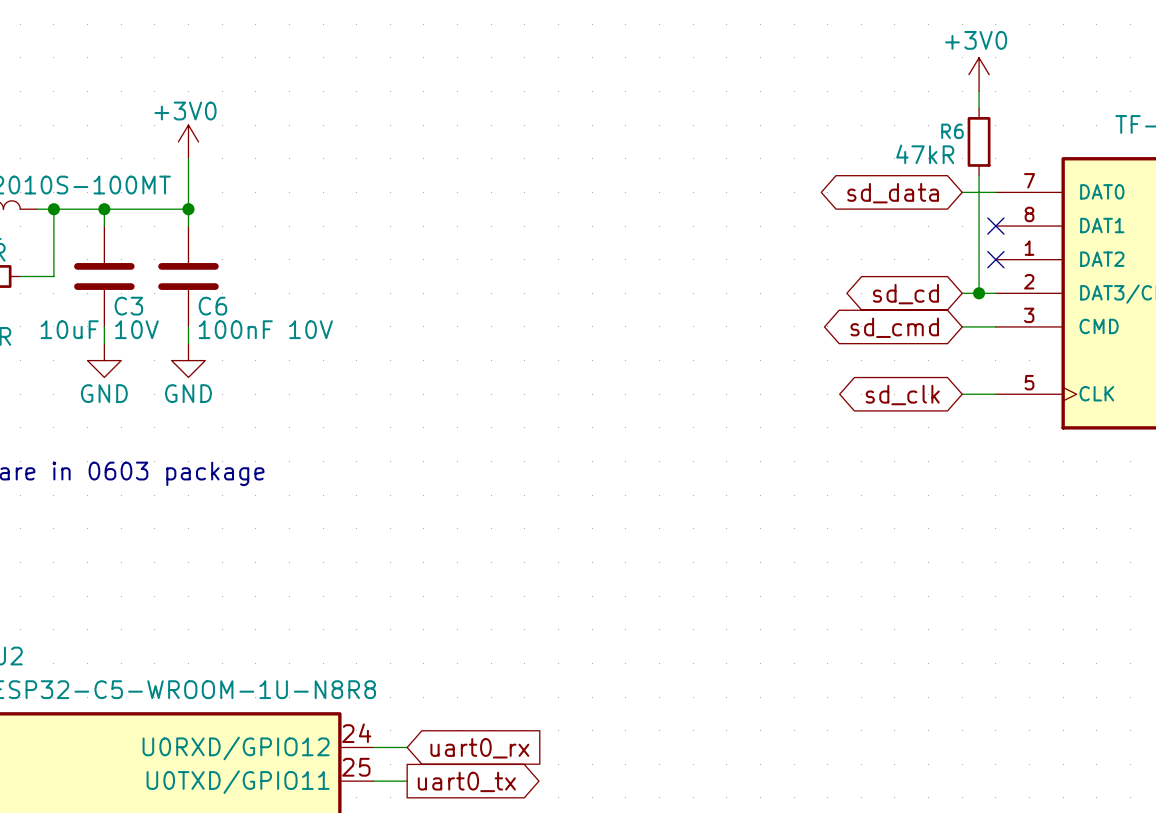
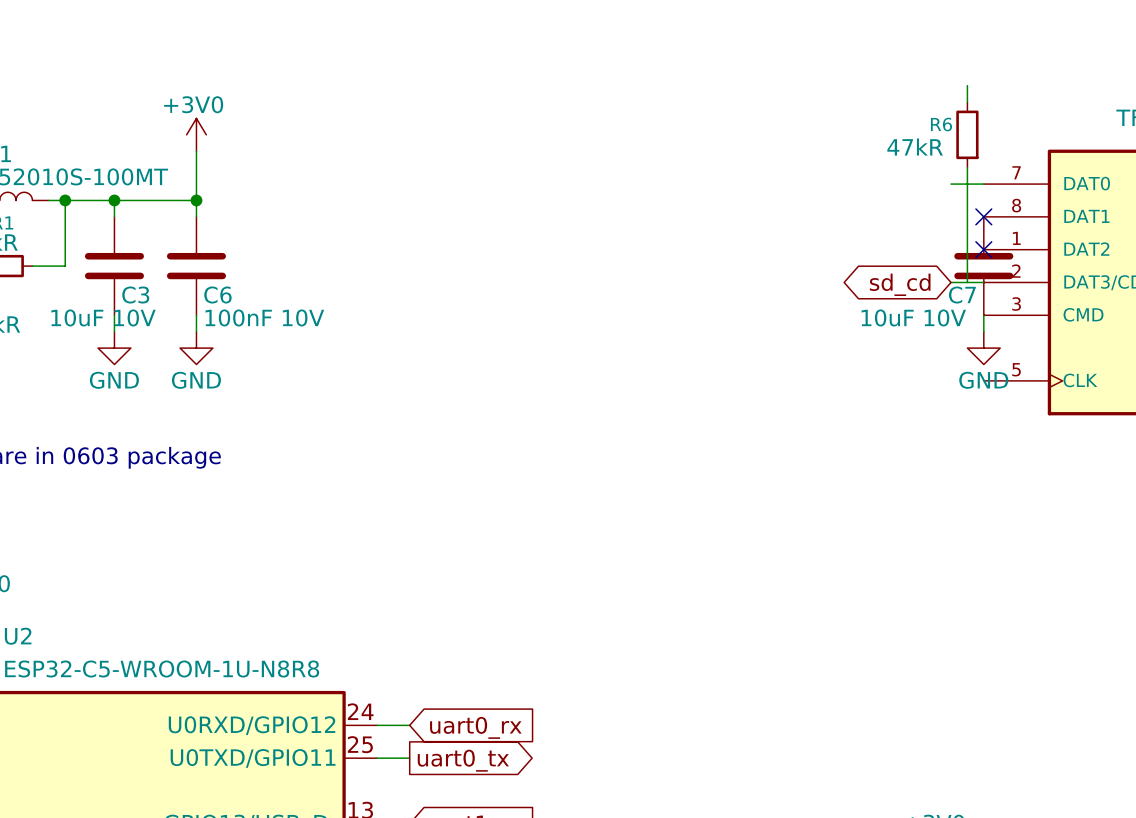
power symbol: +3V0 (979, 74) -> none
global label: sd_data (893, 193) -> none
C7: none -> 10uF 10V (983, 266)
junction: (979, 293) -> none
wire: (962, 326) (995, 326) -> (983, 331) (983, 315)
global label: sd_cmd (894, 327) -> none
power symbol: none -> GND (983, 348)
wire: (962, 394) (995, 394) -> none
global label: sd_clk (902, 395) -> none

